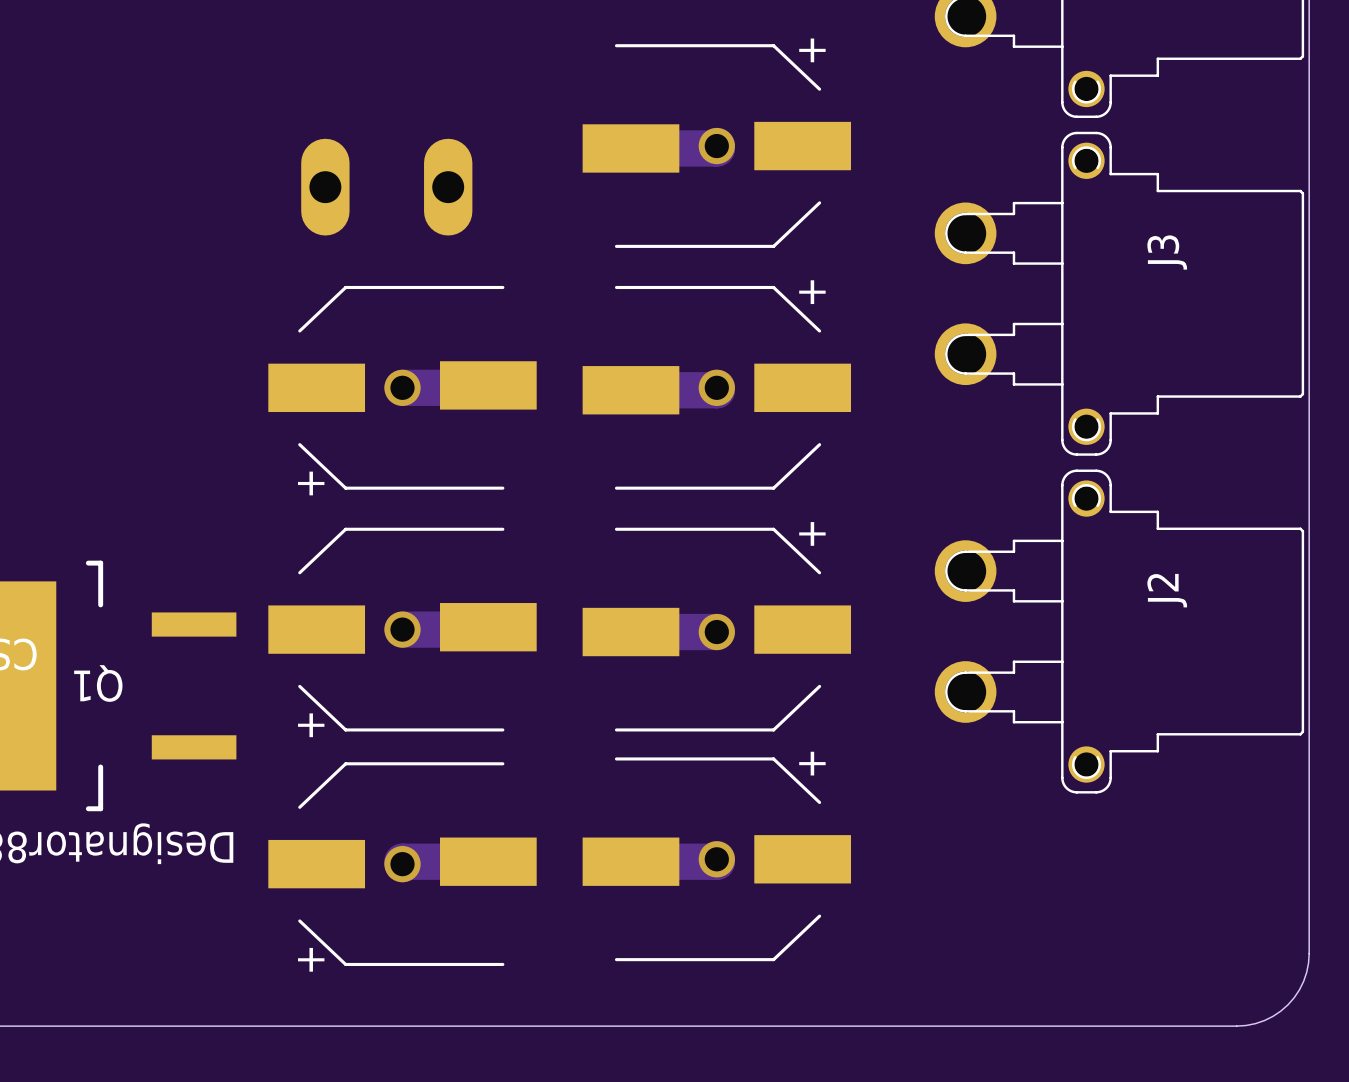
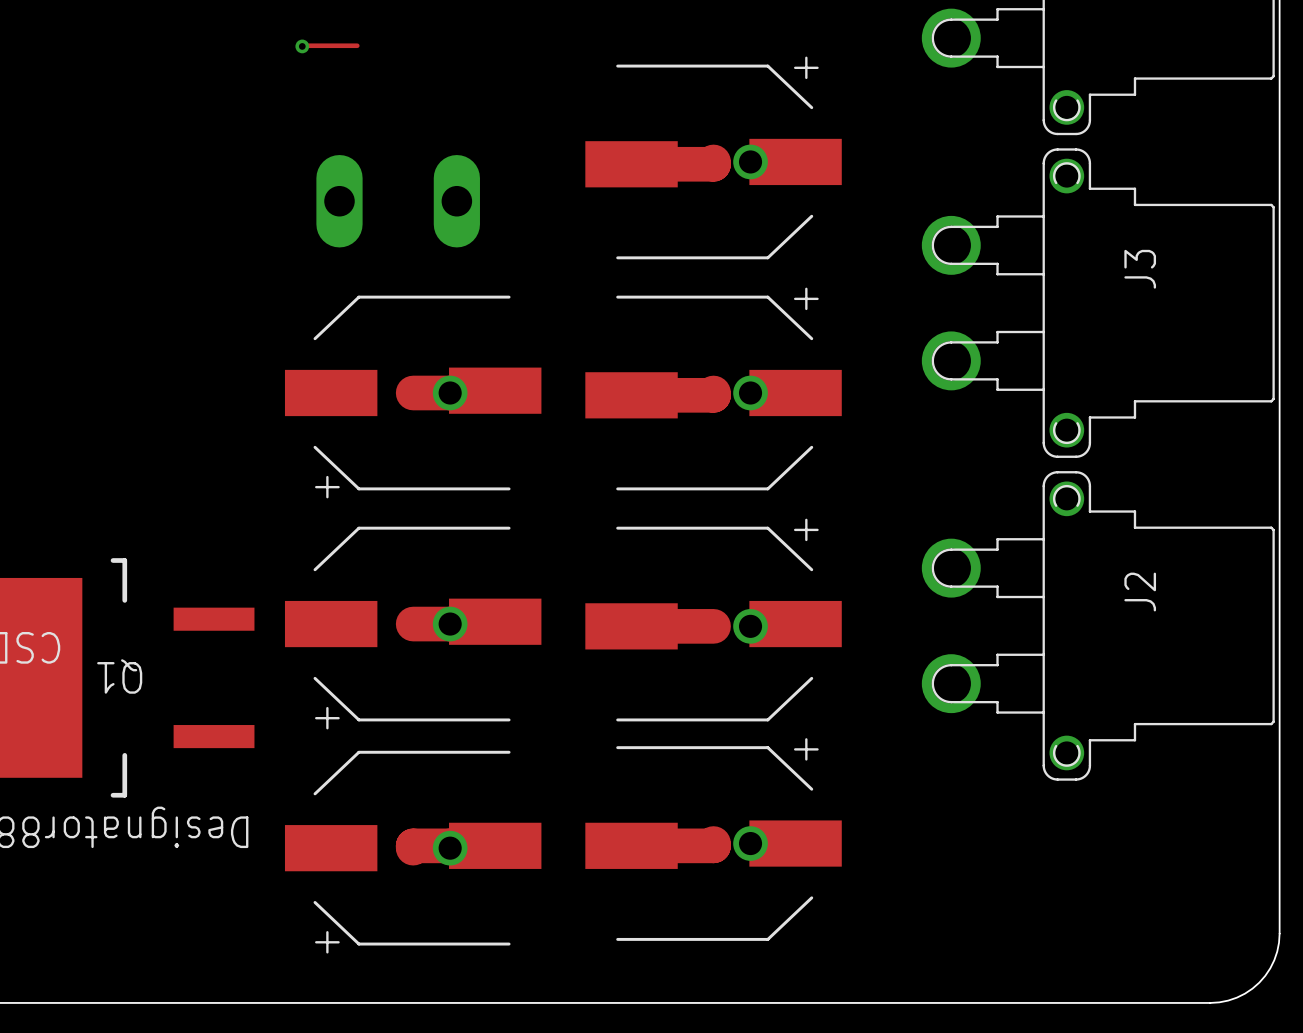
track: none -> (357, 45) (302, 46)
via: none -> (302, 46)
via position: (716, 146) -> (750, 161)
via position: (402, 387) -> (450, 393)
via position: (716, 387) -> (750, 393)
via position: (402, 629) -> (450, 624)
via position: (716, 632) -> (750, 626)
via position: (716, 859) -> (750, 843)
via position: (402, 864) -> (450, 848)

